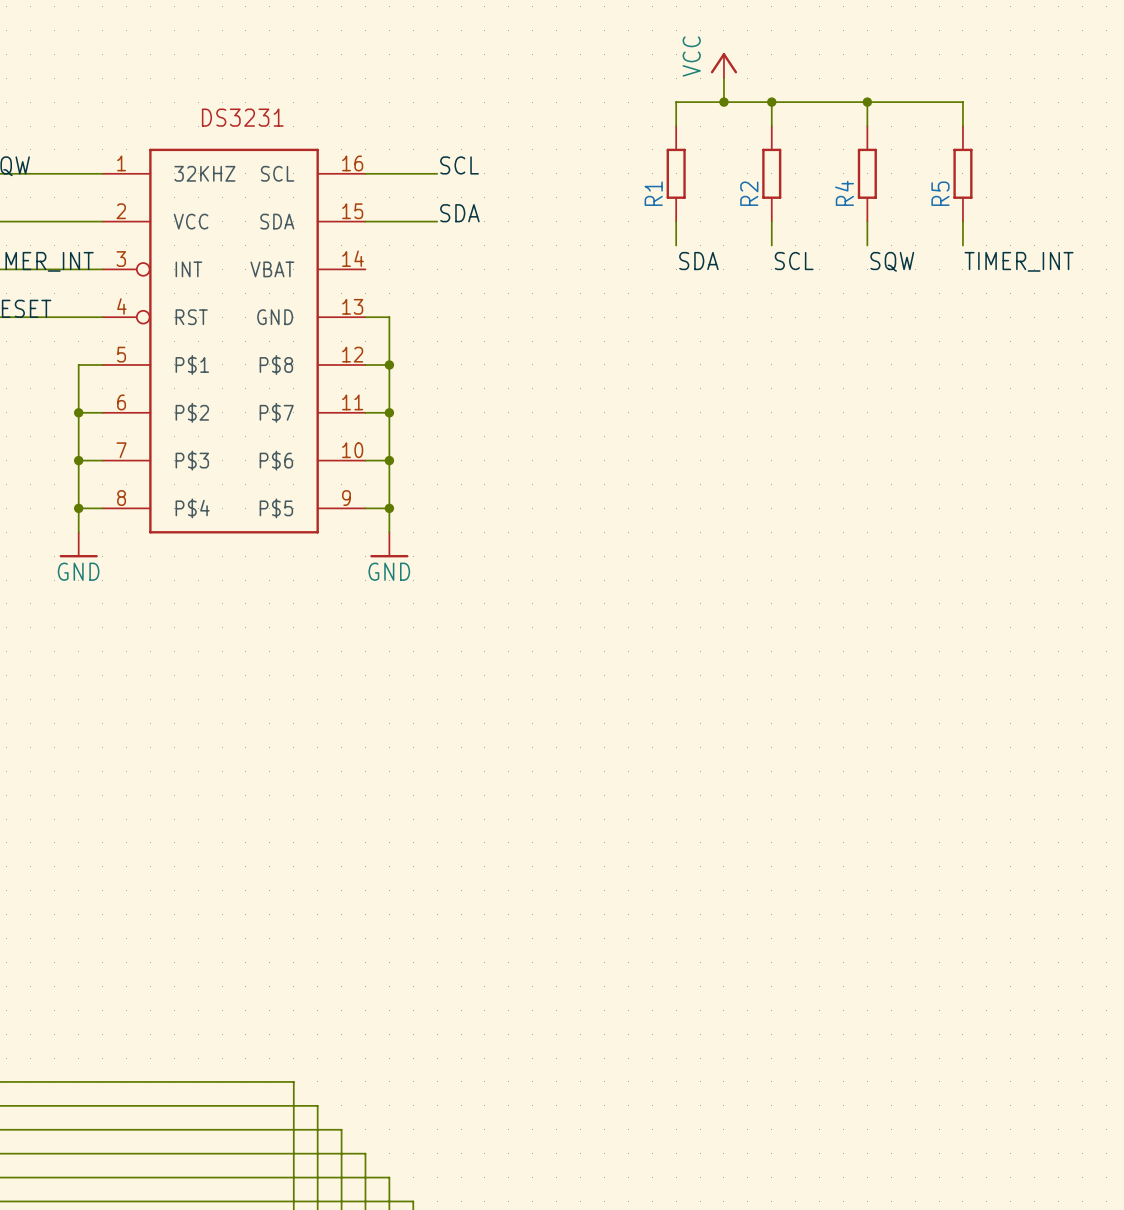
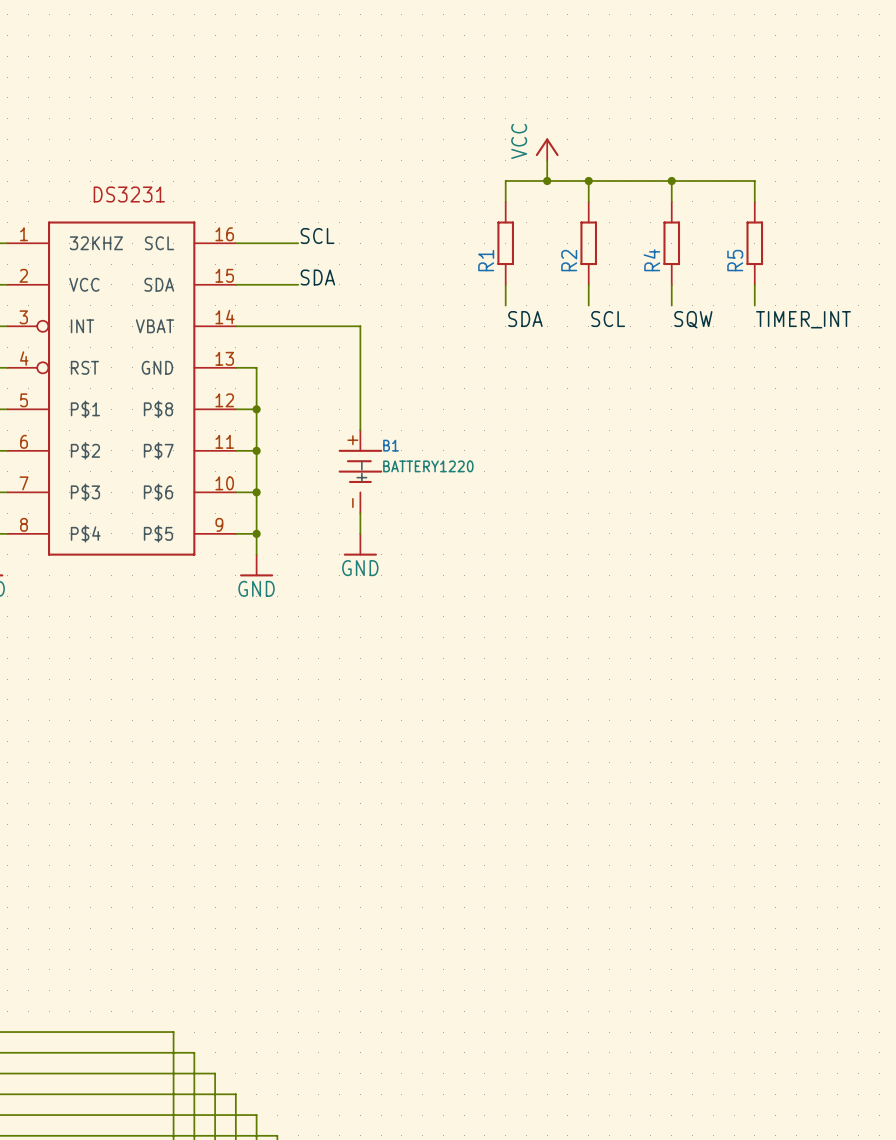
wire: none -> (235, 326) (360, 326) (360, 430)
B1: none -> BATTERY1220 (360, 471)
wire: none -> (360, 513) (360, 533)
power symbol: none -> GND (360, 544)

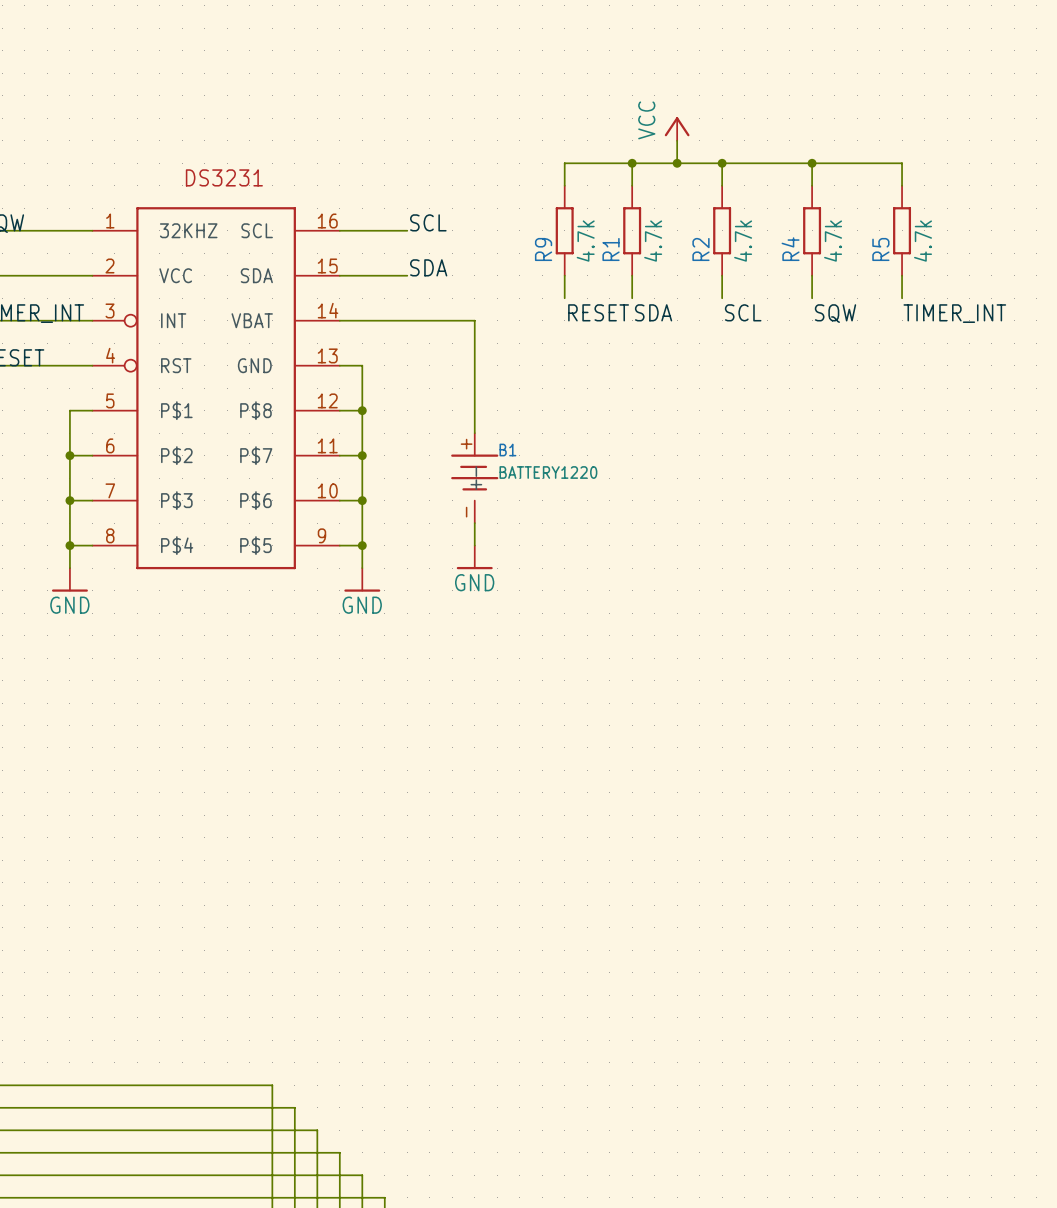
wire: none -> (632, 163) (564, 163) (564, 185)
junction: none -> (632, 163)
R9: none -> 4.7k (564, 230)
R1 value: none -> 4.7k (653, 241)
R2 value: none -> 4.7k (743, 241)
R4 value: none -> 4.7k (833, 241)
R5 value: none -> 4.7k (923, 241)
wire: none -> (564, 275) (564, 298)
label: none -> RESET (598, 312)

